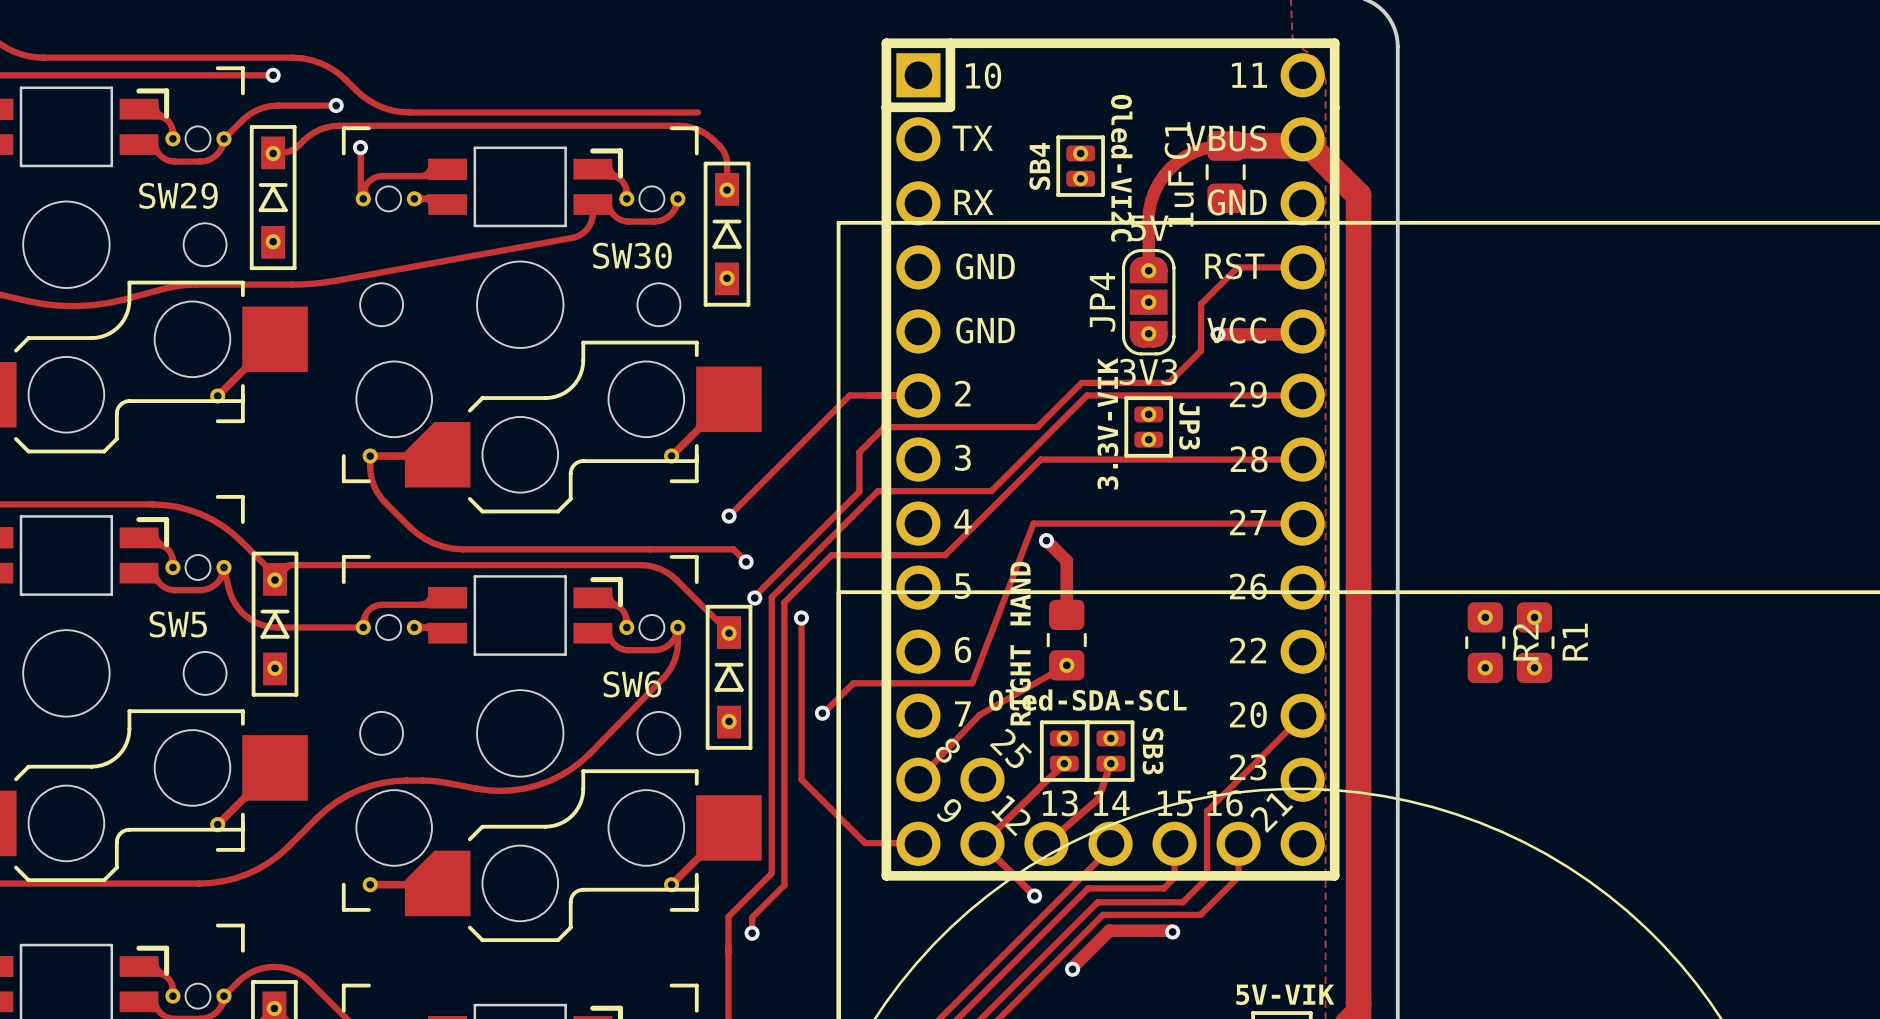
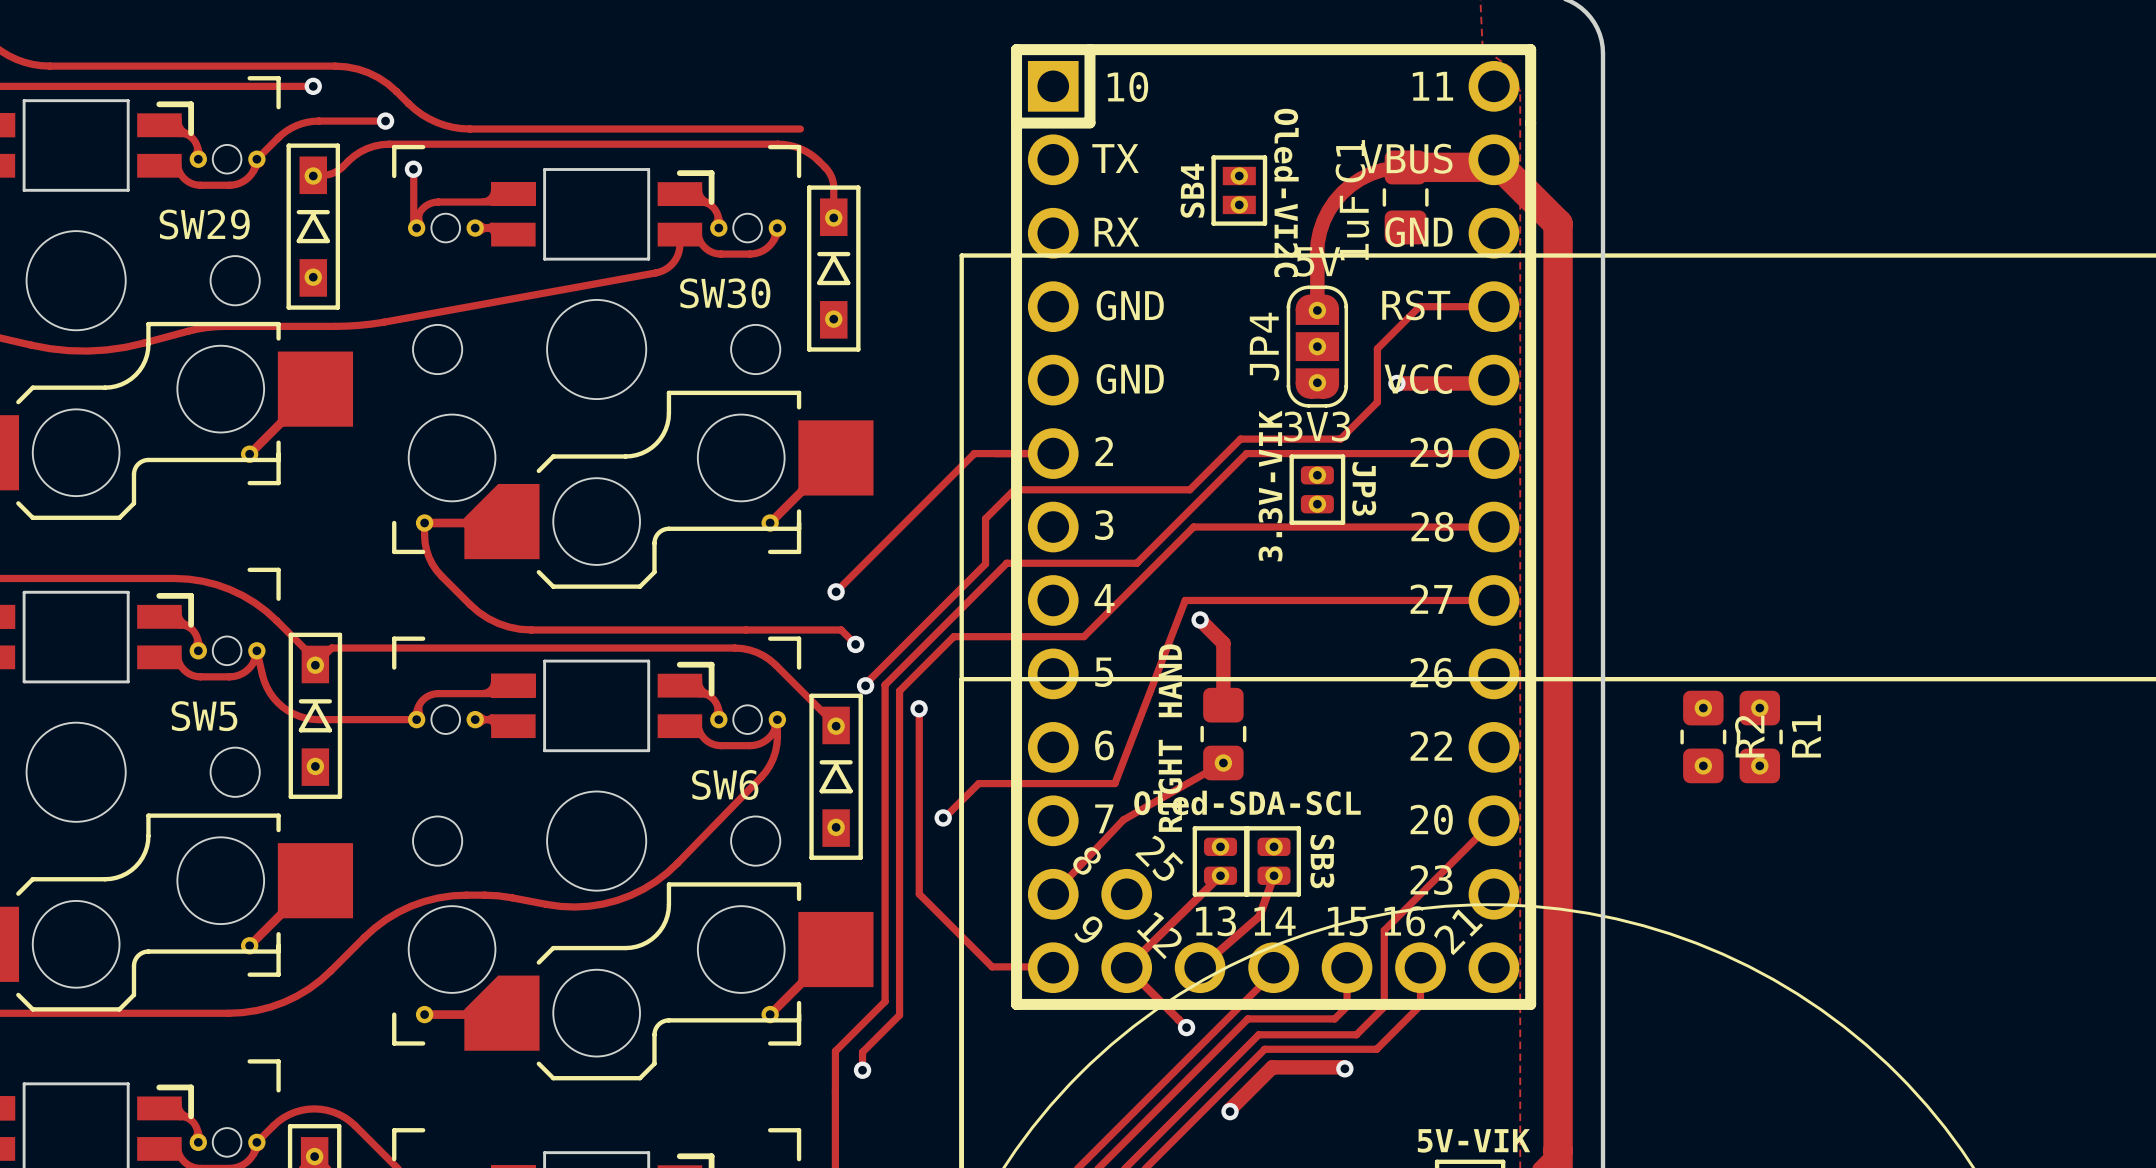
SB4 footprint: [1056, 135, 1105, 197] -> [1211, 155, 1268, 226]

